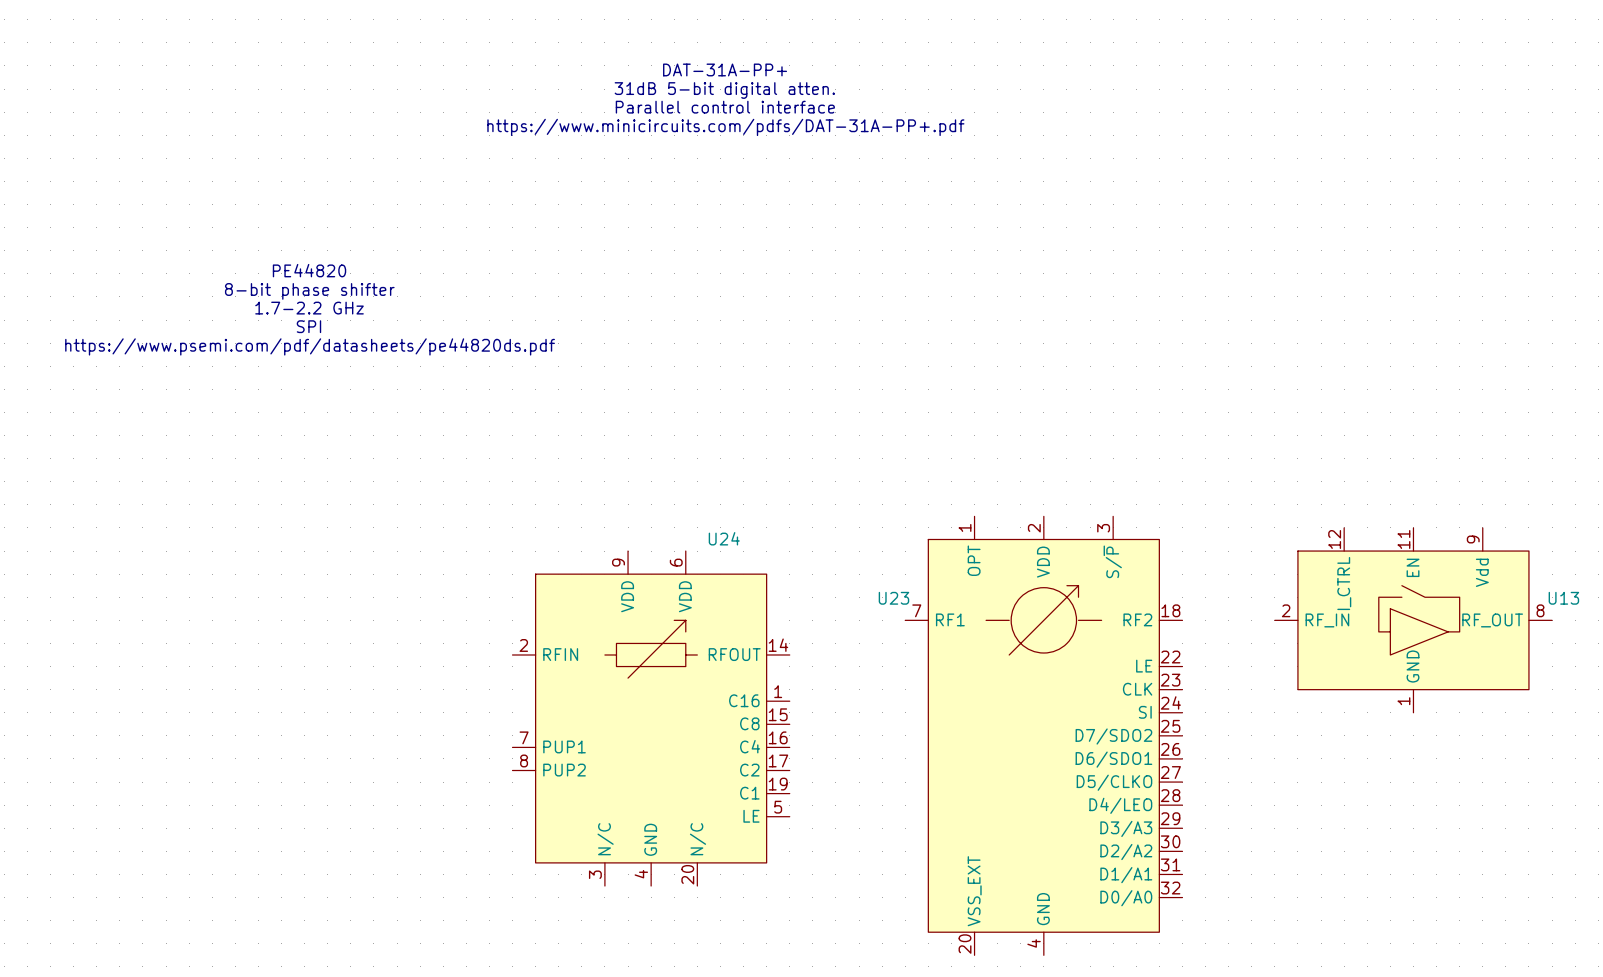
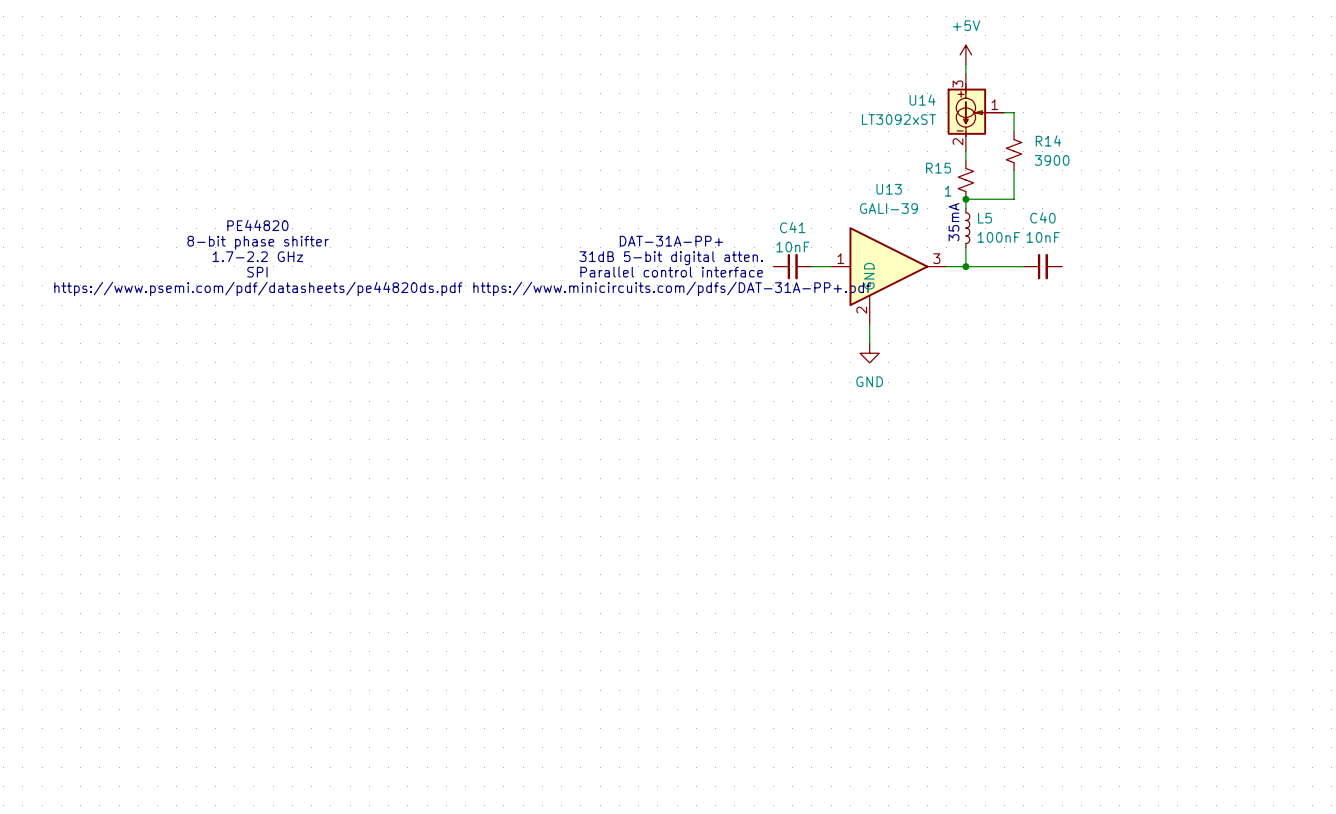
power symbol: none -> +5V (965, 54)
text: DAT-31A-PP+ (725, 69) -> none
wire: none -> (965, 64) (965, 74)
text: 31dB 5-bit digital atten. (724, 90) -> none
text: Parallel control interface (725, 107) -> none
text: https://www.minicircuits.com/pdfs/DAT-31A-PP+.pdf (725, 127) -> none
U14: none -> LT3092xST (976, 112)
wire: none -> (1004, 112) (1014, 112) (1014, 131)
wire: none -> (965, 151) (965, 160)
R14: none -> 3900 (1014, 151)
wire: none -> (1014, 170) (1014, 199) (965, 199) (965, 208)
R15: none -> 1 (965, 180)
junction: none -> (965, 199)
U13 value: none -> GALI-39 (888, 208)
text: none -> 35mA (954, 222)
L5: none -> 100nF (967, 228)
text: none -> DAT-31A-PP+ (671, 241)
wire: none -> (965, 247) (965, 266)
text: none -> 31dB 5-bit digital atten. (671, 258)
C41: none -> 10nF (792, 266)
wire: none -> (811, 266) (831, 266)
wire: none -> (946, 266) (1023, 266)
junction: none -> (965, 266)
C40: none -> 10nF (1042, 266)
text: none -> Parallel control interface (671, 272)
text: none -> https://www.minicircuits.com/pdfs/DAT-31A-PP+.pdf (672, 289)
wire: none -> (869, 324) (869, 343)
power symbol: none -> GND (869, 353)
U13 symbol: [1274, 527, 1553, 713] -> [831, 227, 947, 325]
U13 name position: U13 (1563, 598) -> U13 (889, 189)
U24: (651, 718) -> none
U23: (1043, 735) -> none

